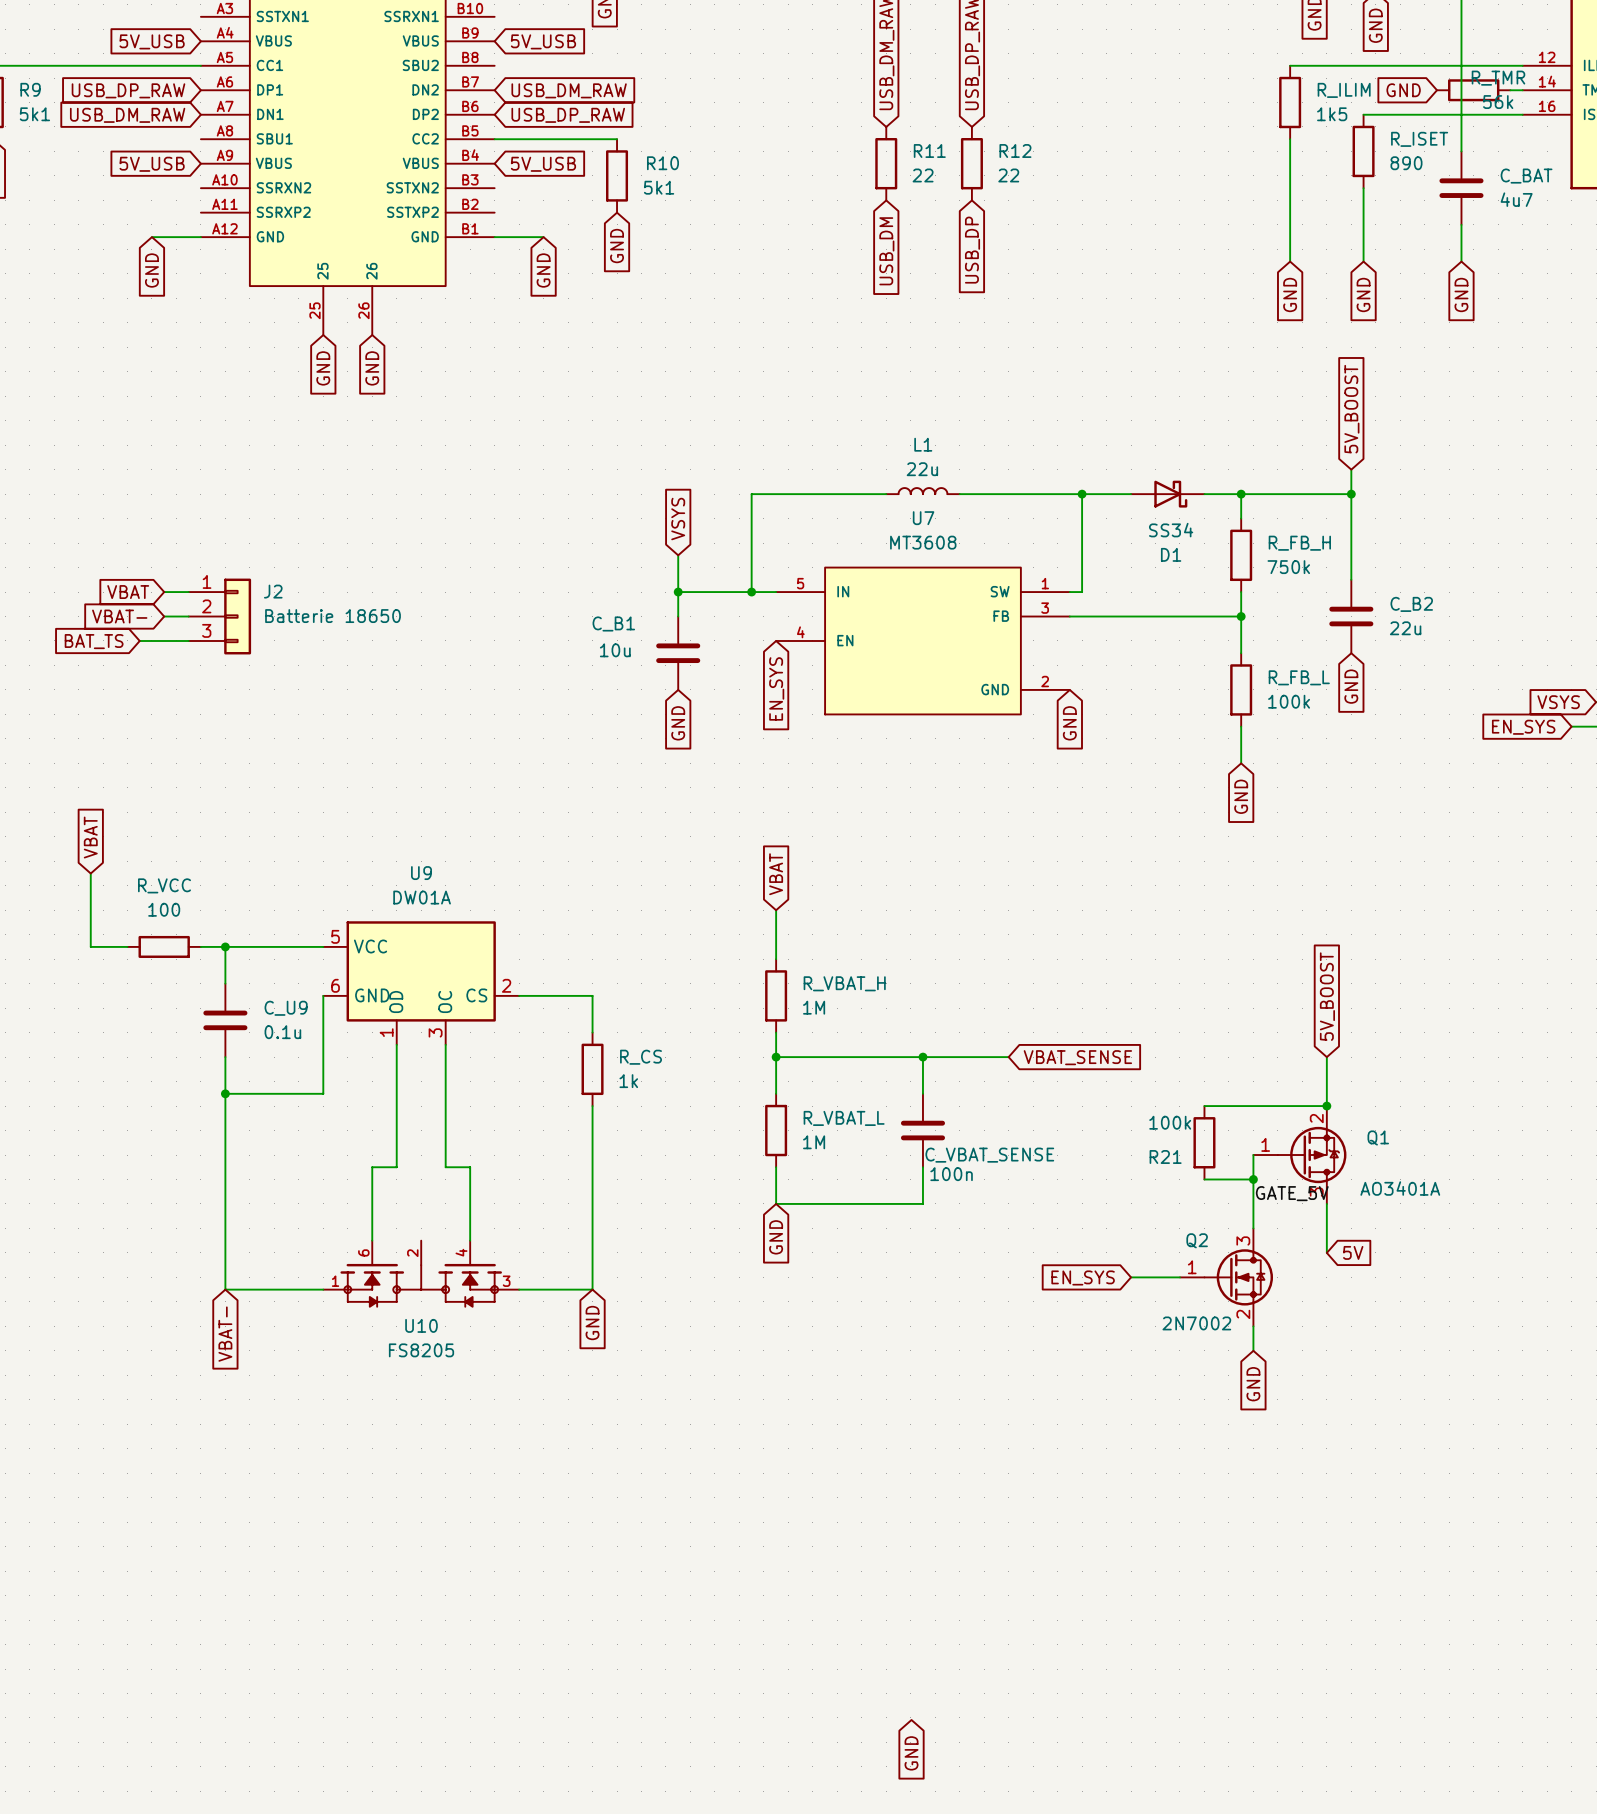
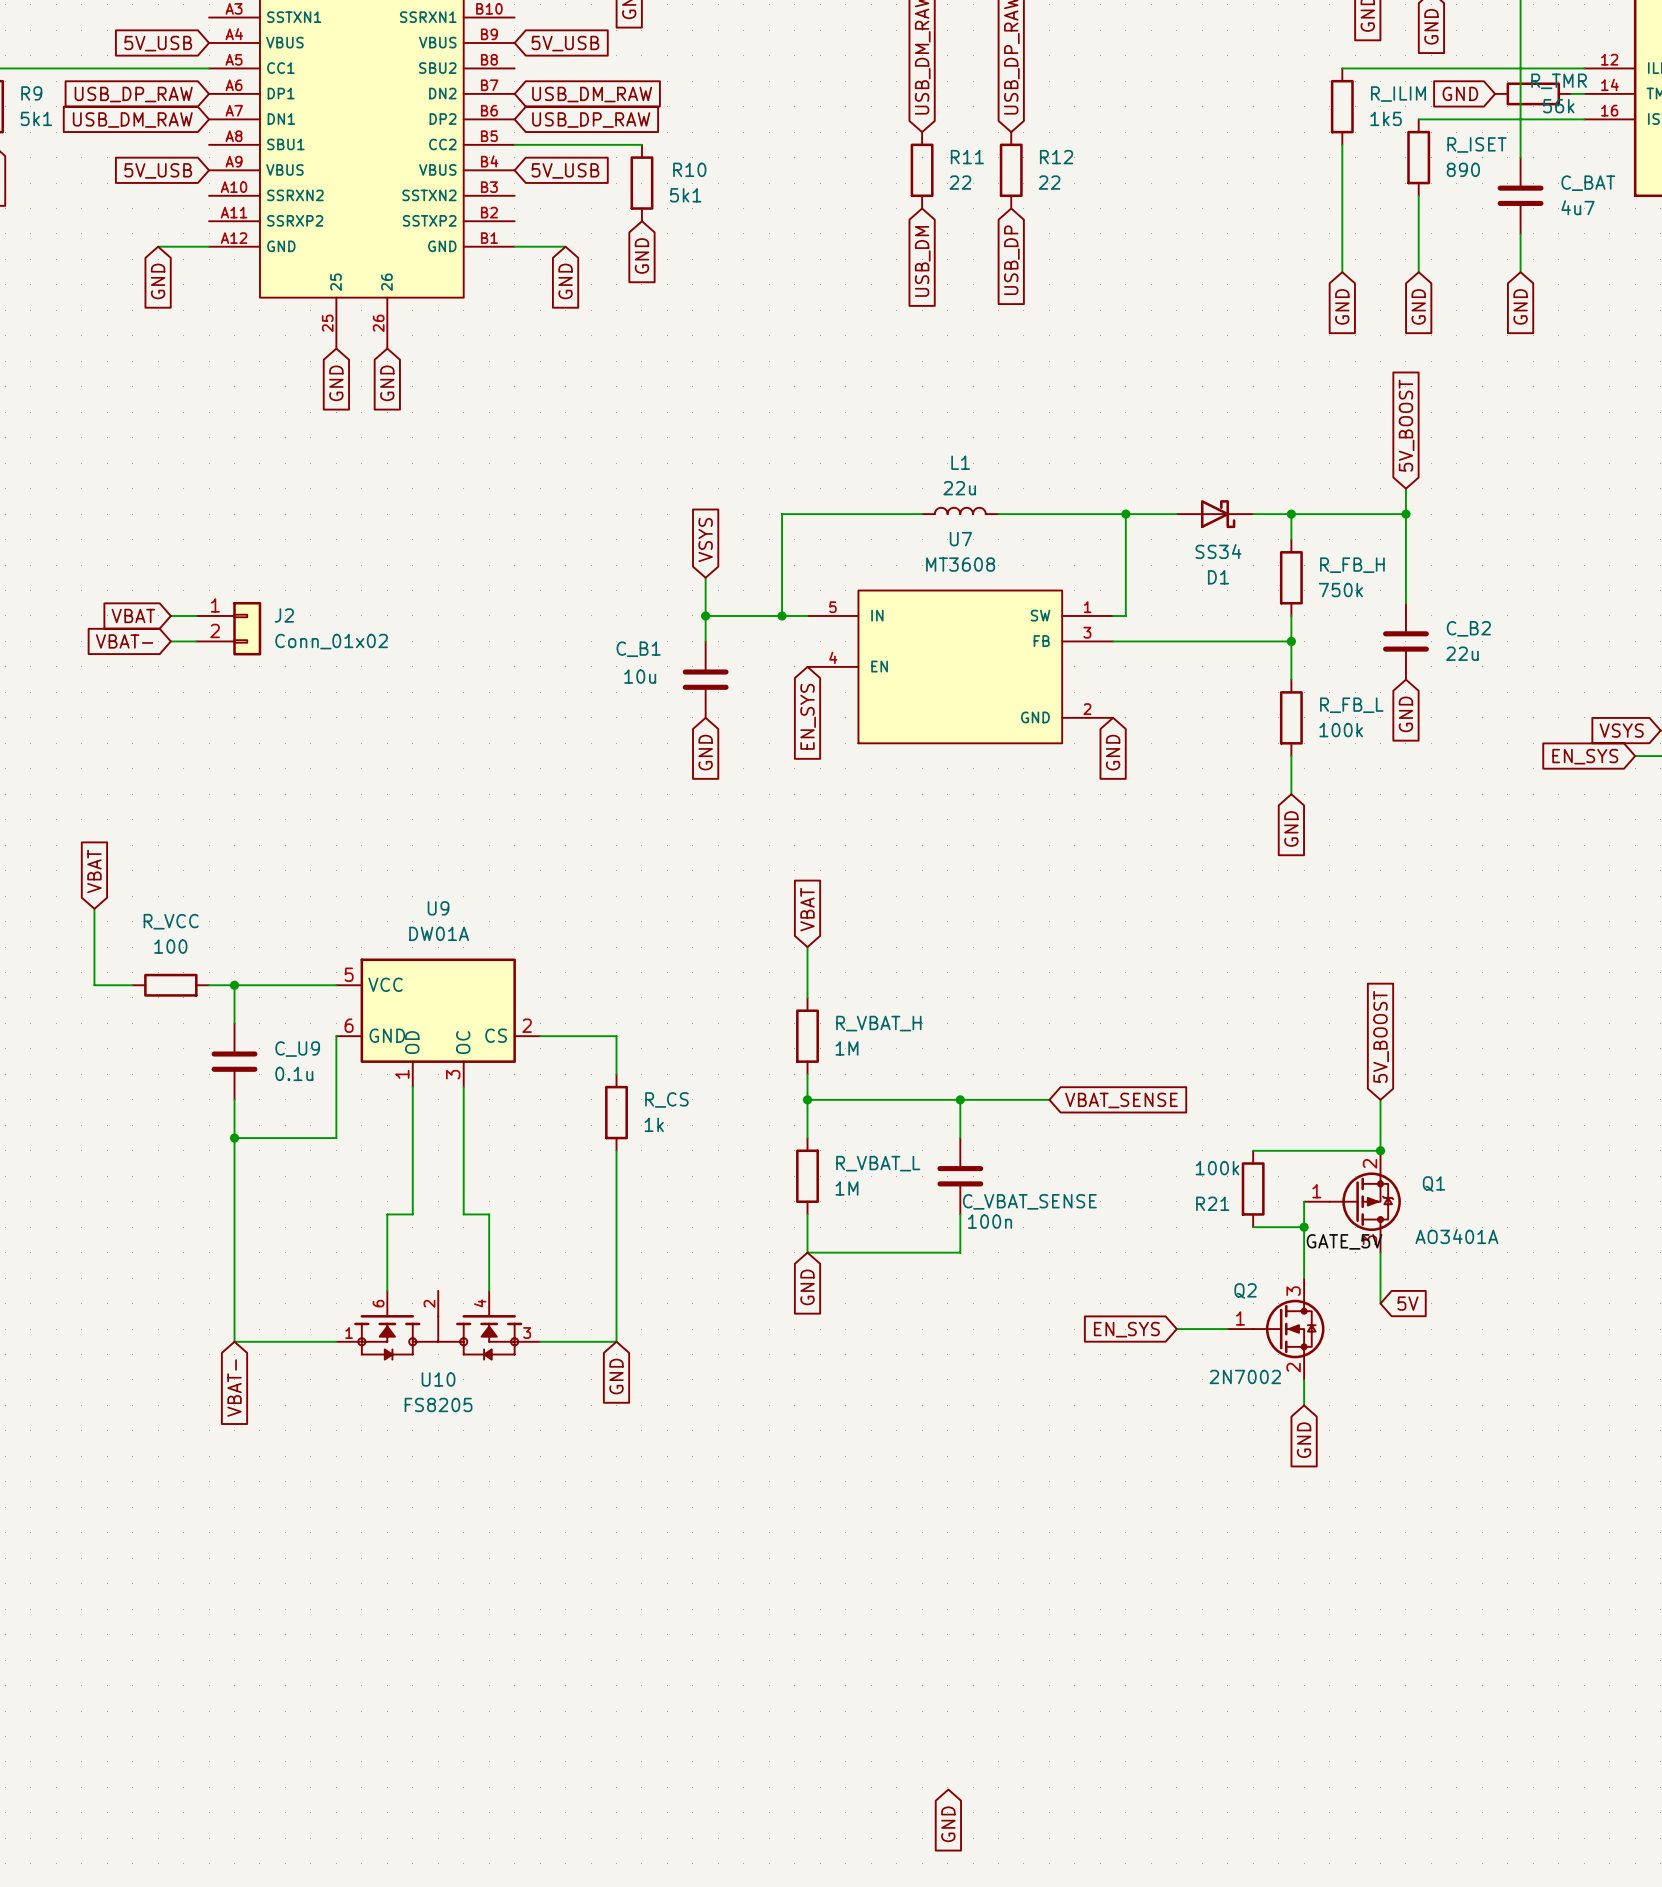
J2 symbol: [188, 578, 252, 655] -> [196, 601, 262, 656]
J2 value: Batterie 18650 (333, 616) -> Conn_01x02 (331, 641)
wire: (139, 640) (188, 640) -> none
global label: BAT_TS (94, 641) -> none

